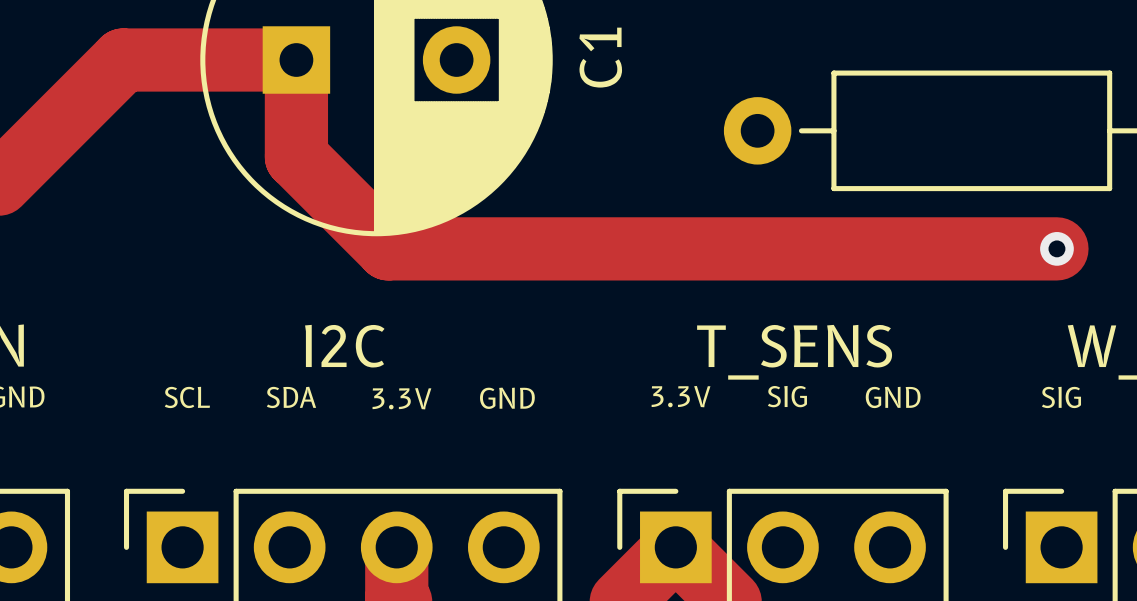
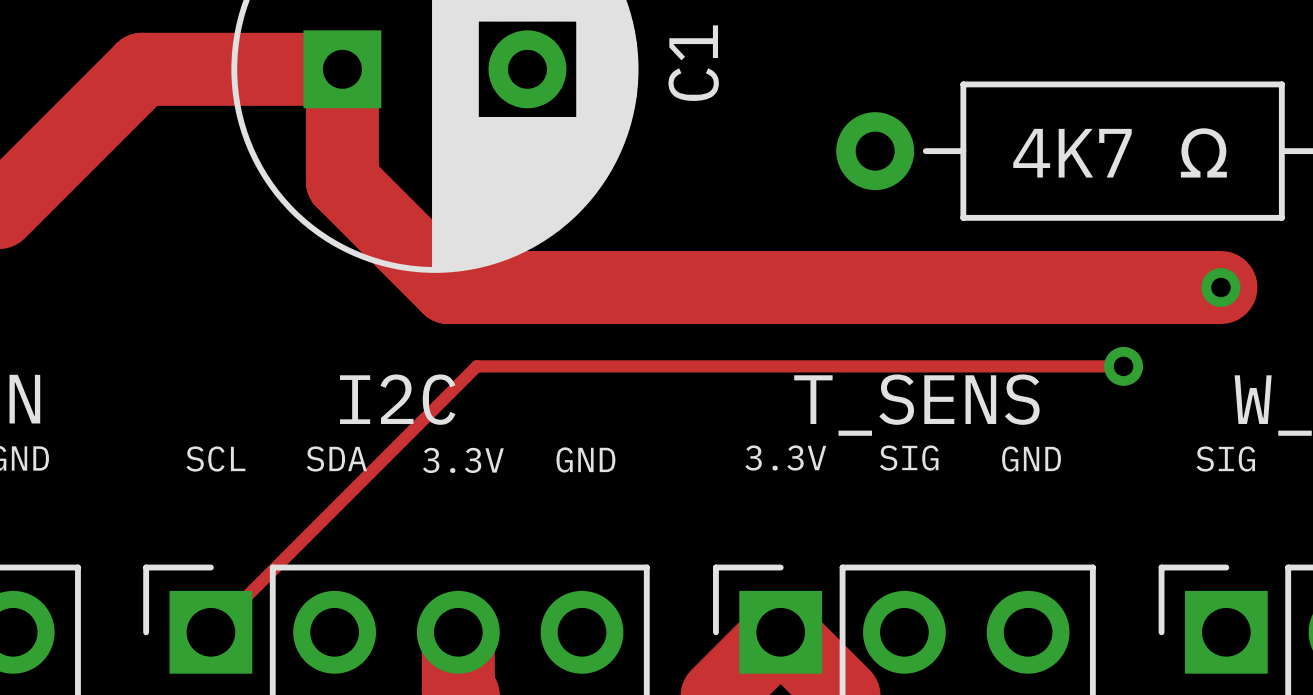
part value: none -> 4K7 Ω (1120, 152)
track: none -> (1123, 366) (476, 366) (210, 632)
via: none -> (1123, 366)

